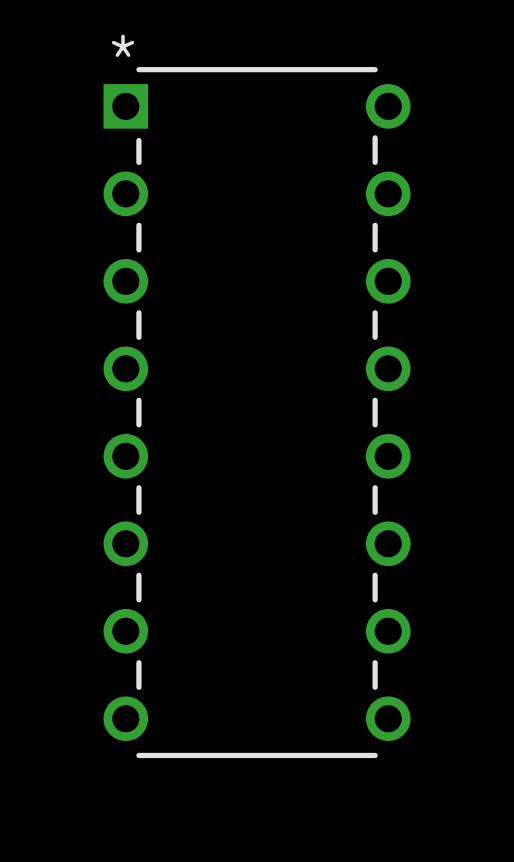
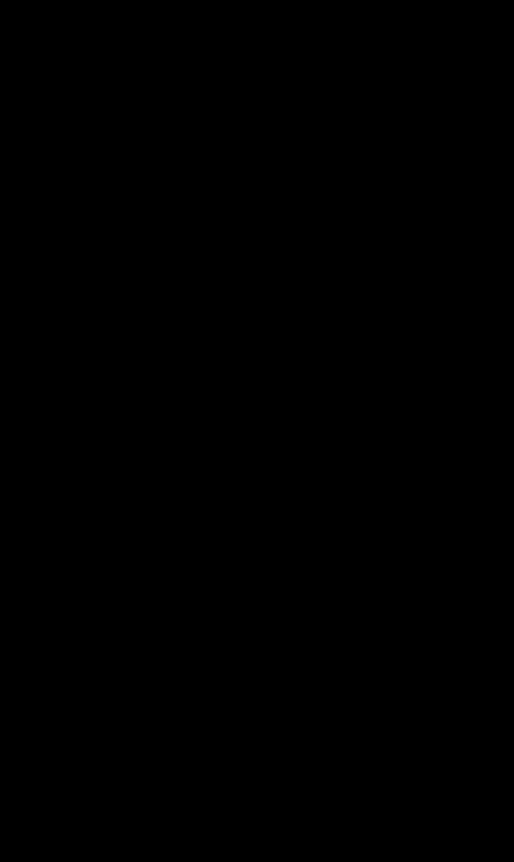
part: (257, 412) -> none

